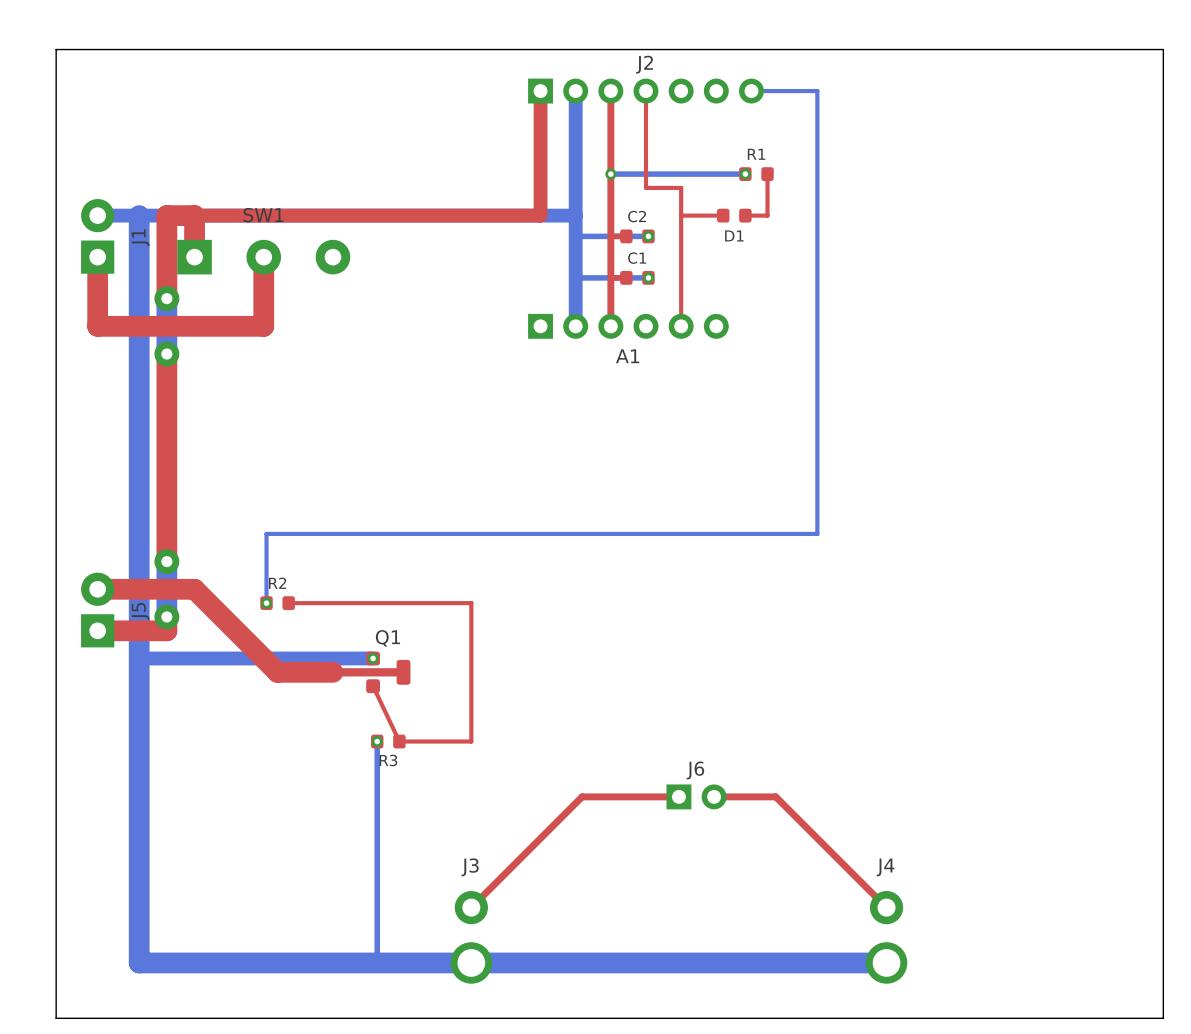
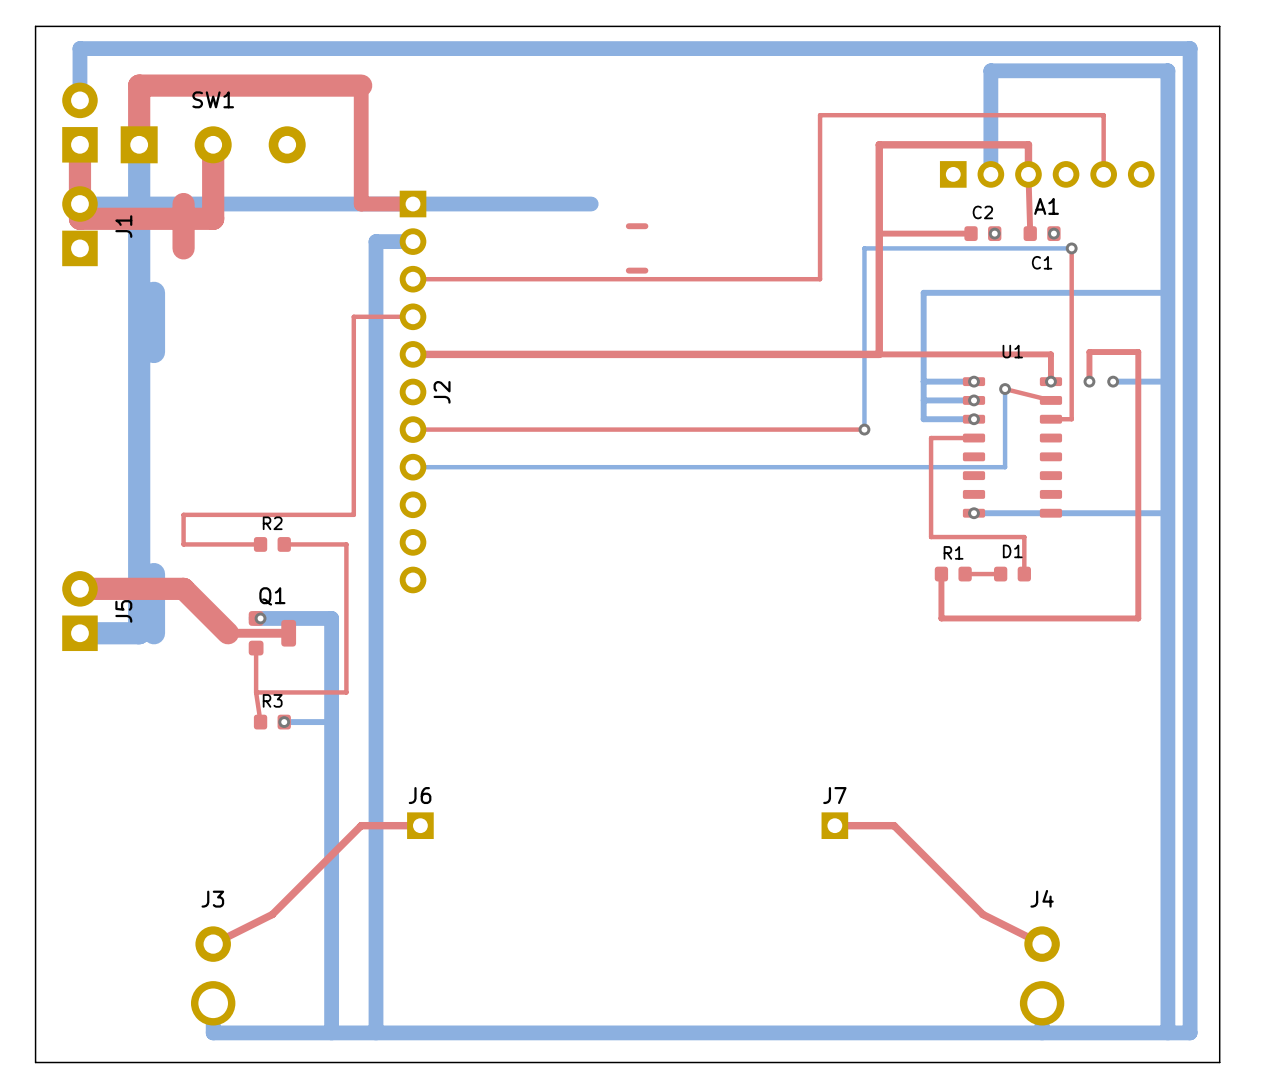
J2 name position: J2 (644, 64) -> J2 (442, 392)
J2 footprint: [528, 78, 764, 104] -> [399, 190, 427, 594]
top track: (540, 91) (540, 215) (409, 215) -> none
bottom track: (575, 91) (575, 326) -> none
top track: (610, 91) (610, 326) -> none
top track: (646, 91) (646, 187) (681, 187) (681, 326) -> none
bottom track: (751, 91) (817, 91) (817, 533) (266, 533) (266, 603) -> none
bottom track: none -> (79, 100) (79, 48) (1190, 48) (1190, 1032) (213, 1032) (213, 1003)
part: none -> (79, 122)
top track: none -> (79, 144) (79, 218) (213, 218) (213, 144)
bottom track: none -> (139, 144) (139, 633) (79, 633)
bottom track: (610, 174) (745, 174) -> none
via: (610, 174) -> none
via: (745, 174) -> none
R1 position: (756, 174) -> (953, 574)
top track: (767, 174) (767, 215) (745, 215) -> none
bottom track: none -> (990, 174) (990, 70) (1167, 70) (1167, 1032)
top track: none -> (1103, 174) (1103, 115) (820, 115) (820, 279) (413, 279)
bottom track: (139, 215) (139, 962) (886, 962) -> none
top track: (360, 215) (166, 215) (166, 298) -> (361, 204) (361, 85) (139, 85) (139, 144)
top track: (681, 215) (723, 215) -> none
D1 position: (734, 215) -> (1012, 574)
D1 name position: D1 (734, 235) -> D1 (1012, 551)
bottom track: (575, 236) (648, 236) -> none
C2 position: (637, 236) -> (982, 233)
via: (648, 236) -> none
top track: none -> (879, 233) (971, 233)
via: none -> (994, 233)
top track: none -> (1030, 233) (1028, 144) (879, 144) (879, 354)
via: none -> (1053, 233)
bottom track: none -> (413, 241) (376, 241) (376, 1032)
top track: (97, 257) (97, 326) (263, 326) (263, 257) -> none
SW1 position: (263, 257) -> (213, 144)
top track: none -> (1071, 248) (1071, 419) (1050, 419)
bottom track: none -> (1071, 248) (864, 248) (864, 429)
via: none -> (1071, 248)
C1 name position: C1 (637, 258) -> C1 (1042, 262)
bottom track: (575, 277) (648, 277) -> none
C1 position: (637, 277) -> (1042, 233)
via: (648, 277) -> none
via: (166, 298) -> none
bottom track: none -> (1167, 292) (923, 292) (923, 419) (973, 419)
top track: none -> (413, 316) (353, 316) (353, 514) (183, 514) (183, 544) (260, 544)
A1 position: (628, 326) -> (1047, 174)
top track: (166, 354) (166, 561) -> none
via: (166, 354) -> none
top track: none -> (413, 354) (879, 354)
top track: none -> (879, 354) (1050, 354) (1050, 381)
bottom track: none -> (923, 381) (973, 381)
via: none -> (973, 381)
via: none -> (1050, 381)
top track: none -> (1089, 381) (1089, 352) (1138, 352) (1138, 618) (941, 618) (941, 574)
via: none -> (1089, 381)
bottom track: none -> (1113, 381) (1167, 381)
via: none -> (1113, 381)
top track: none -> (1005, 389) (1050, 400)
bottom track: none -> (1005, 389) (1005, 467) (413, 467)
via: none -> (1005, 389)
bottom track: none -> (923, 400) (973, 400)
via: none -> (973, 400)
via: none -> (973, 419)
top track: none -> (413, 429) (864, 429)
via: none -> (864, 429)
top track: none -> (973, 438) (931, 438) (931, 537) (1024, 537) (1024, 574)
U1: none -> (1012, 447)
bottom track: none -> (973, 513) (1167, 513)
via: none -> (973, 513)
via: (166, 561) -> none
top track: none -> (965, 574) (1000, 574)
top track: none -> (79, 588) (183, 588) (227, 633) (288, 633)
top track: (97, 589) (194, 589) (277, 672) -> (256, 692) (272, 692)
bottom track: none -> (256, 618) (331, 618) (331, 1032)
R2 position: (277, 603) -> (272, 544)
top track: (288, 603) (471, 603) (471, 741) (399, 741) (373, 686) -> none
J5 position: (97, 610) -> (79, 611)
top track: (166, 616) (166, 630) (97, 630) -> none
via: (166, 616) -> none
top track: none -> (256, 648) (256, 692)
bottom track: (139, 658) (373, 658) -> none
via: (373, 658) -> none
top track: none -> (256, 692) (260, 722)
top track width: thick (277, 672) (346, 672) -> thin (272, 692) (346, 692)
top track: (346, 672) (403, 672) -> (346, 692) (346, 544) (284, 544)
Q1 position: (388, 672) -> (272, 633)
bottom track: none -> (284, 722) (331, 722)
via: none -> (284, 722)
via: (377, 741) -> none
R3 position: (388, 741) -> (272, 722)
R3 name position: R3 (388, 760) -> R3 (272, 700)
J6 footprint: [666, 784, 727, 810] -> [407, 812, 434, 840]
top track: none -> (420, 825) (361, 825) (272, 914) (213, 944)
top track: (678, 796) (582, 796) (471, 907) -> none
top track: (714, 796) (775, 796) (886, 907) -> none
top track: none -> (834, 825) (894, 825) (982, 914) (1042, 944)
J7: none -> (834, 825)
J3 position: (471, 937) -> (213, 975)
J4 position: (886, 937) -> (1042, 975)

